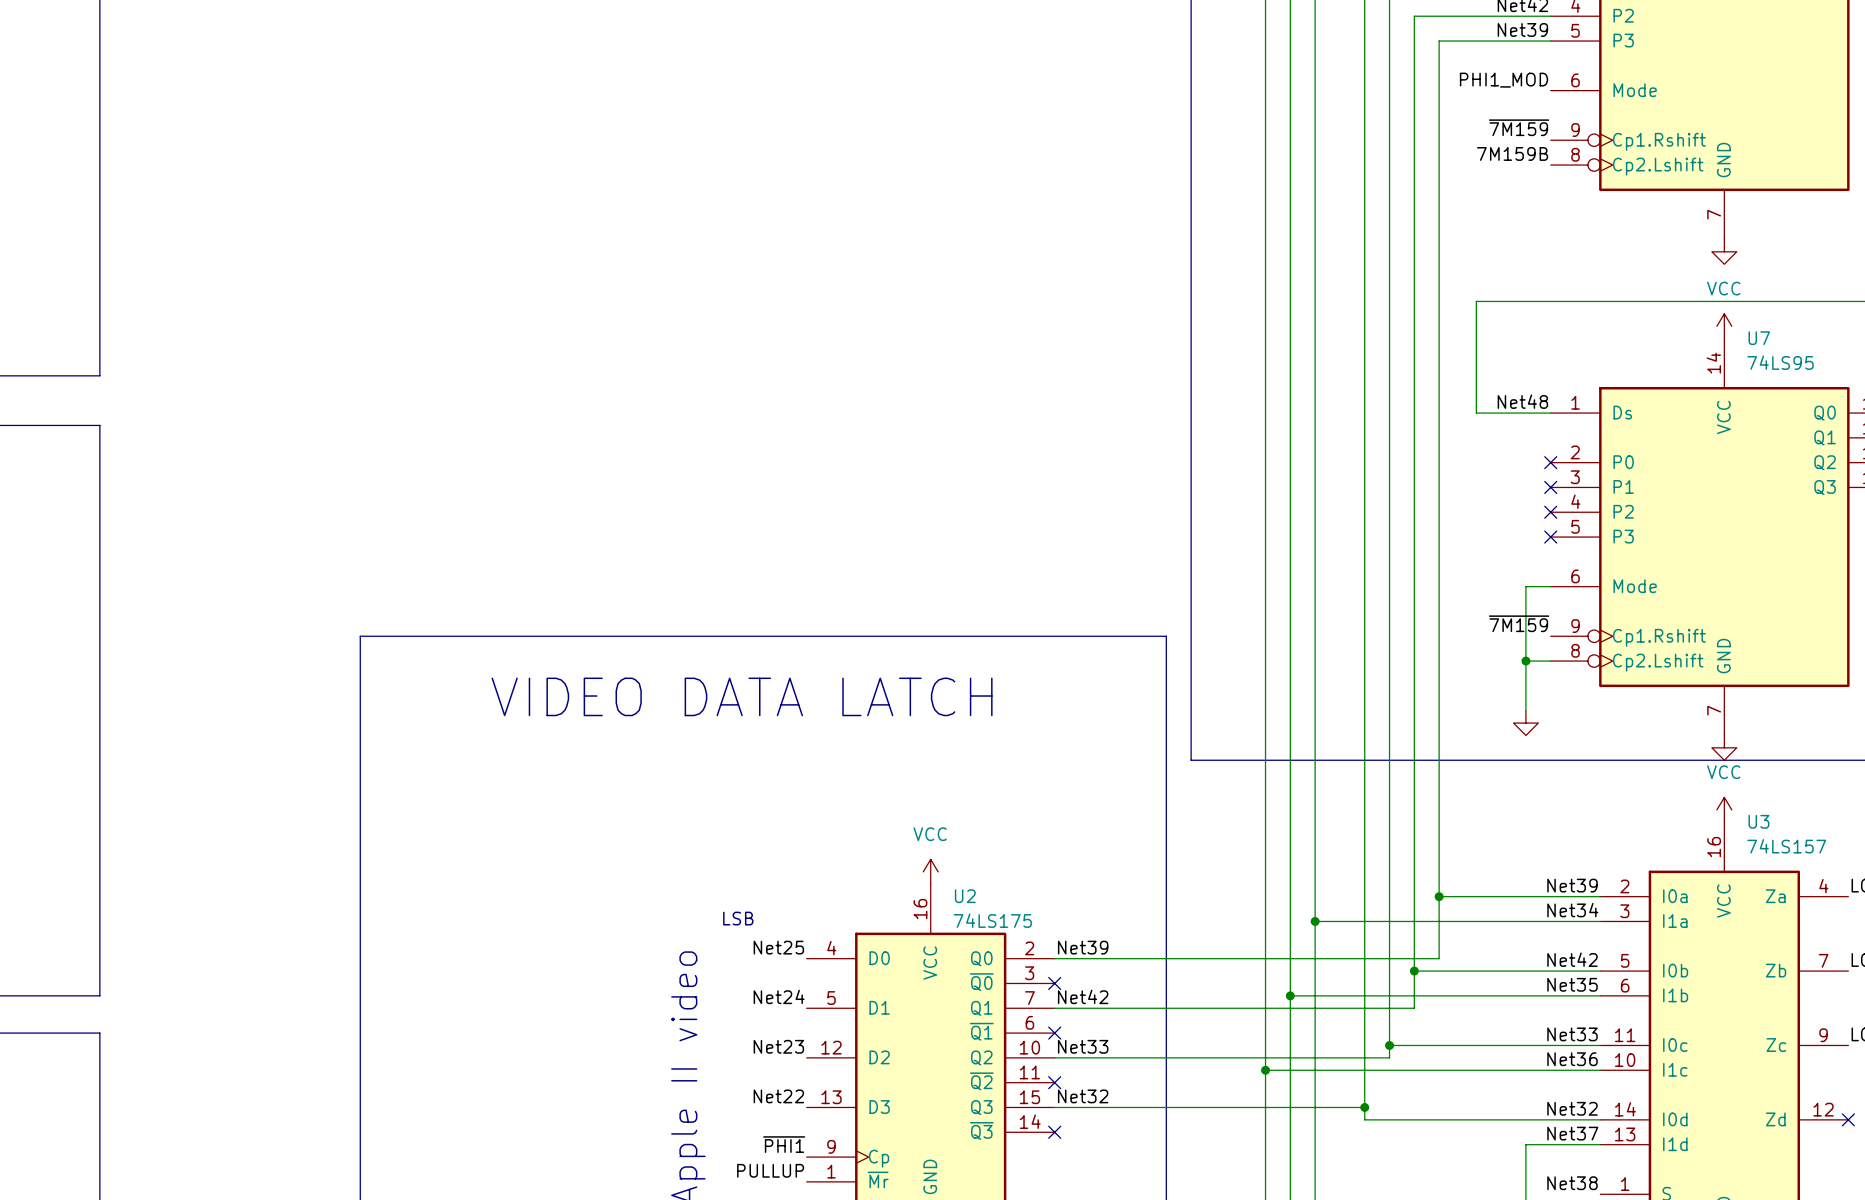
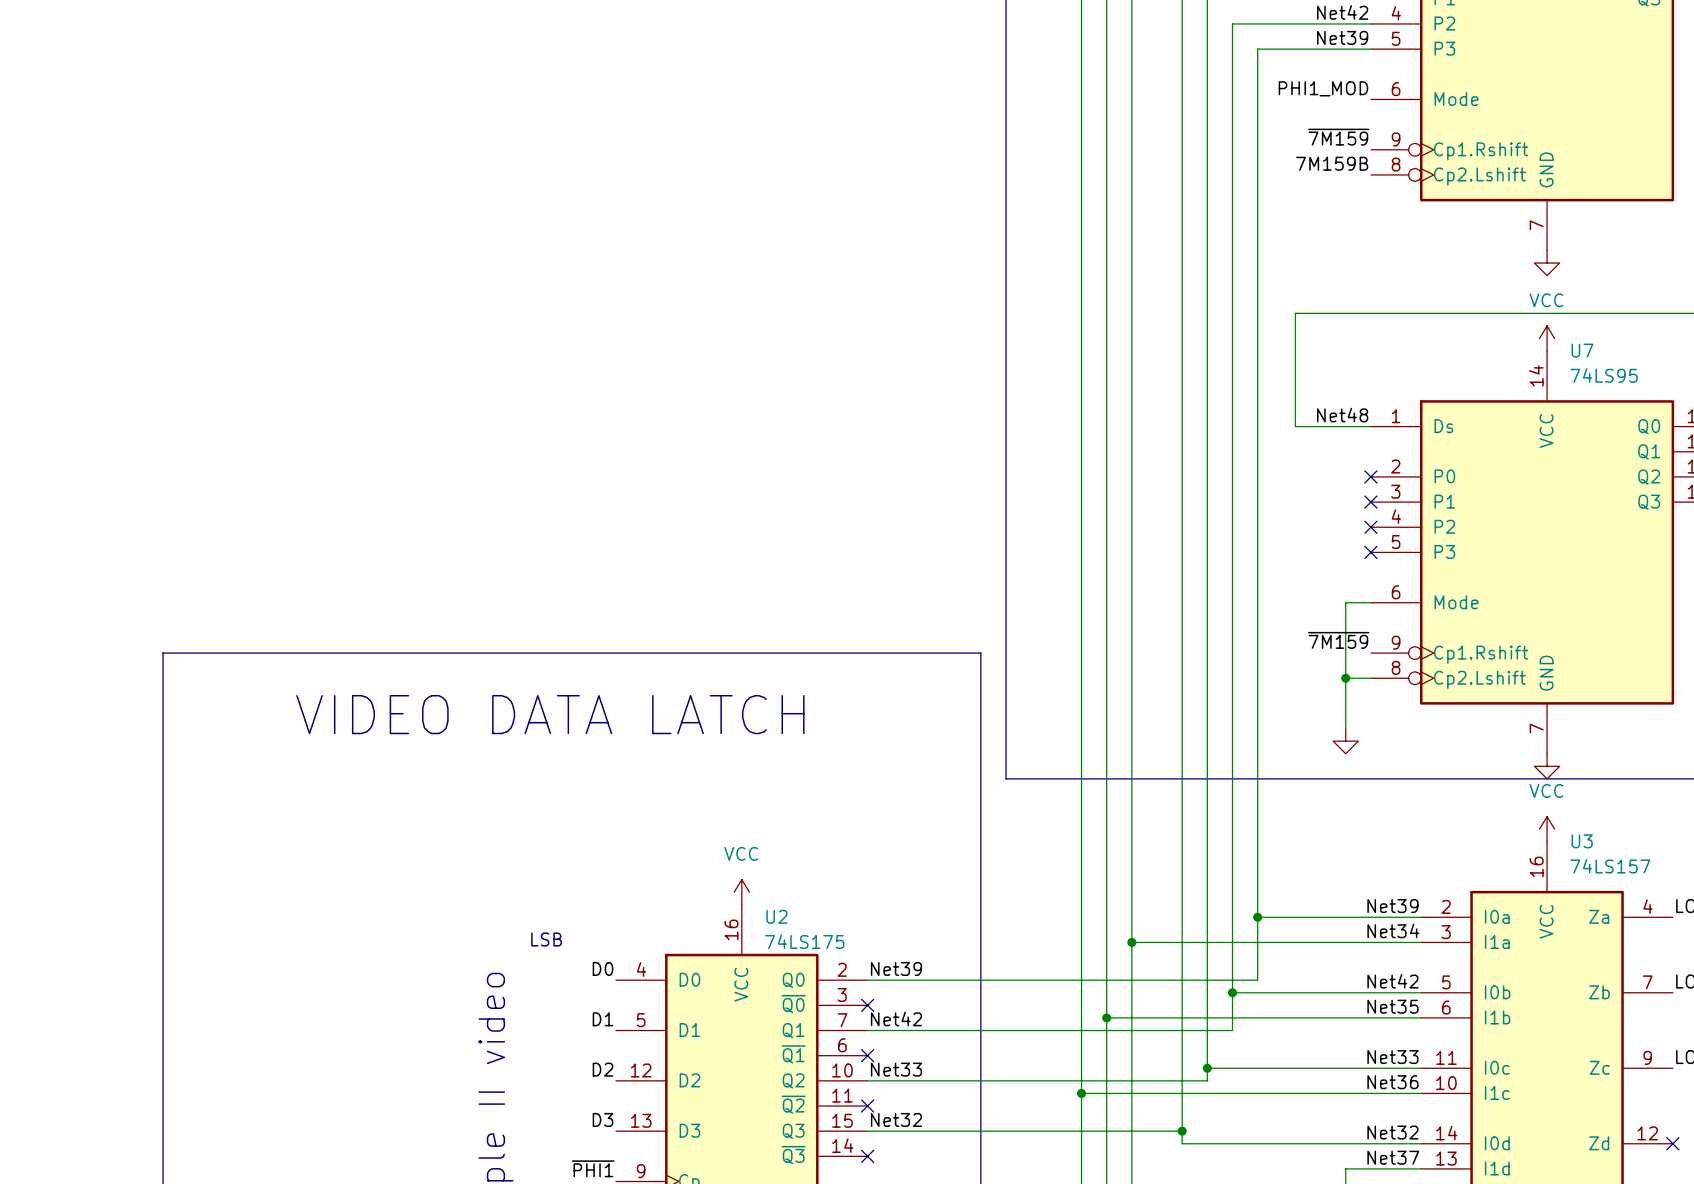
label: Net25 (778, 947) -> D0 (603, 968)
label: Net24 (779, 996) -> D1 (603, 1019)
label: Net23 (778, 1046) -> D2 (603, 1069)
label: Net22 (778, 1096) -> D3 (603, 1119)

